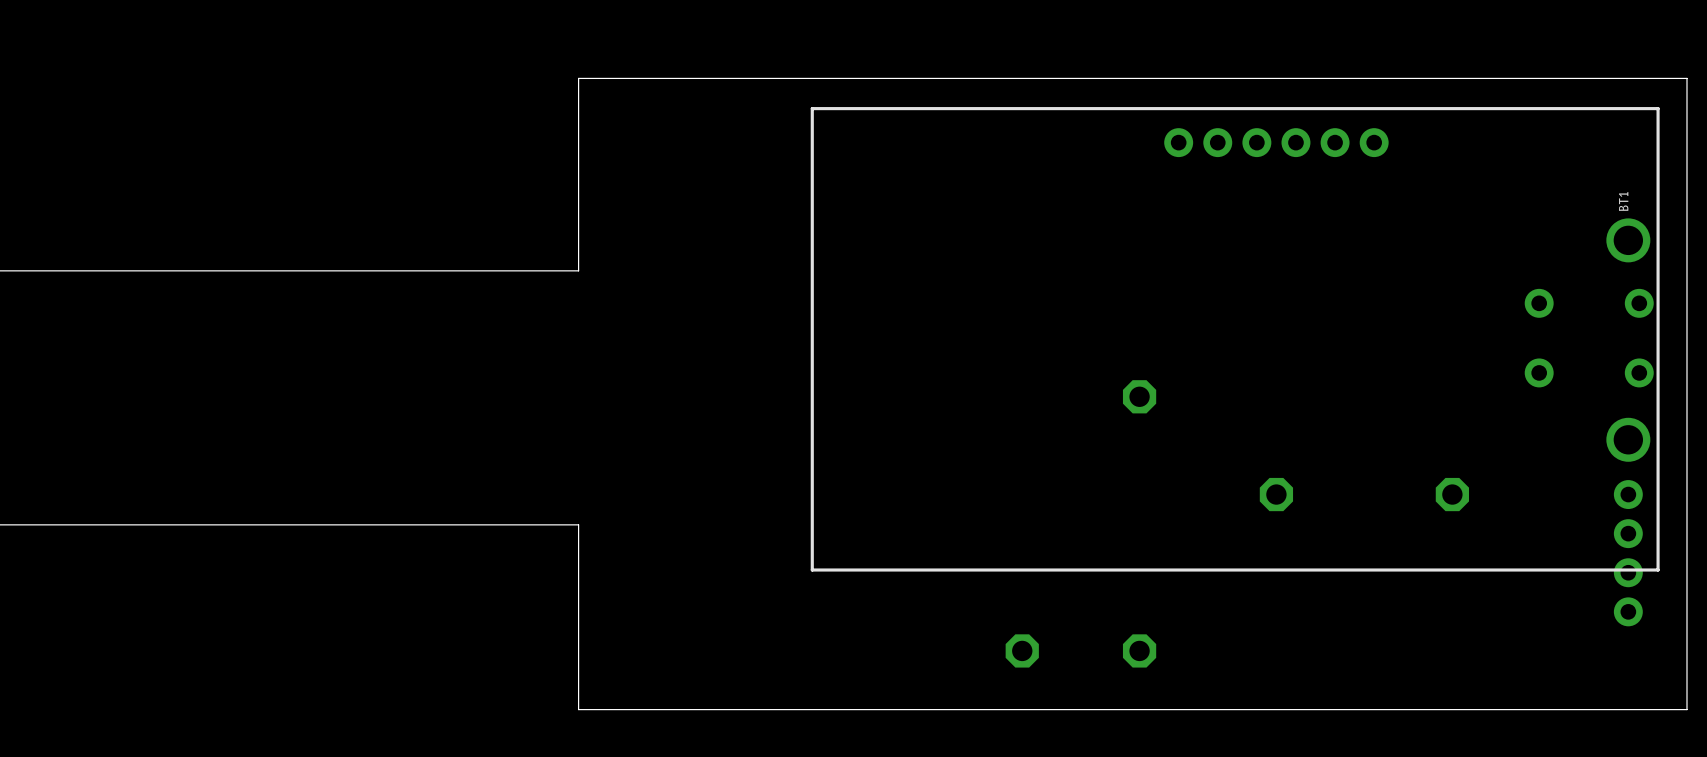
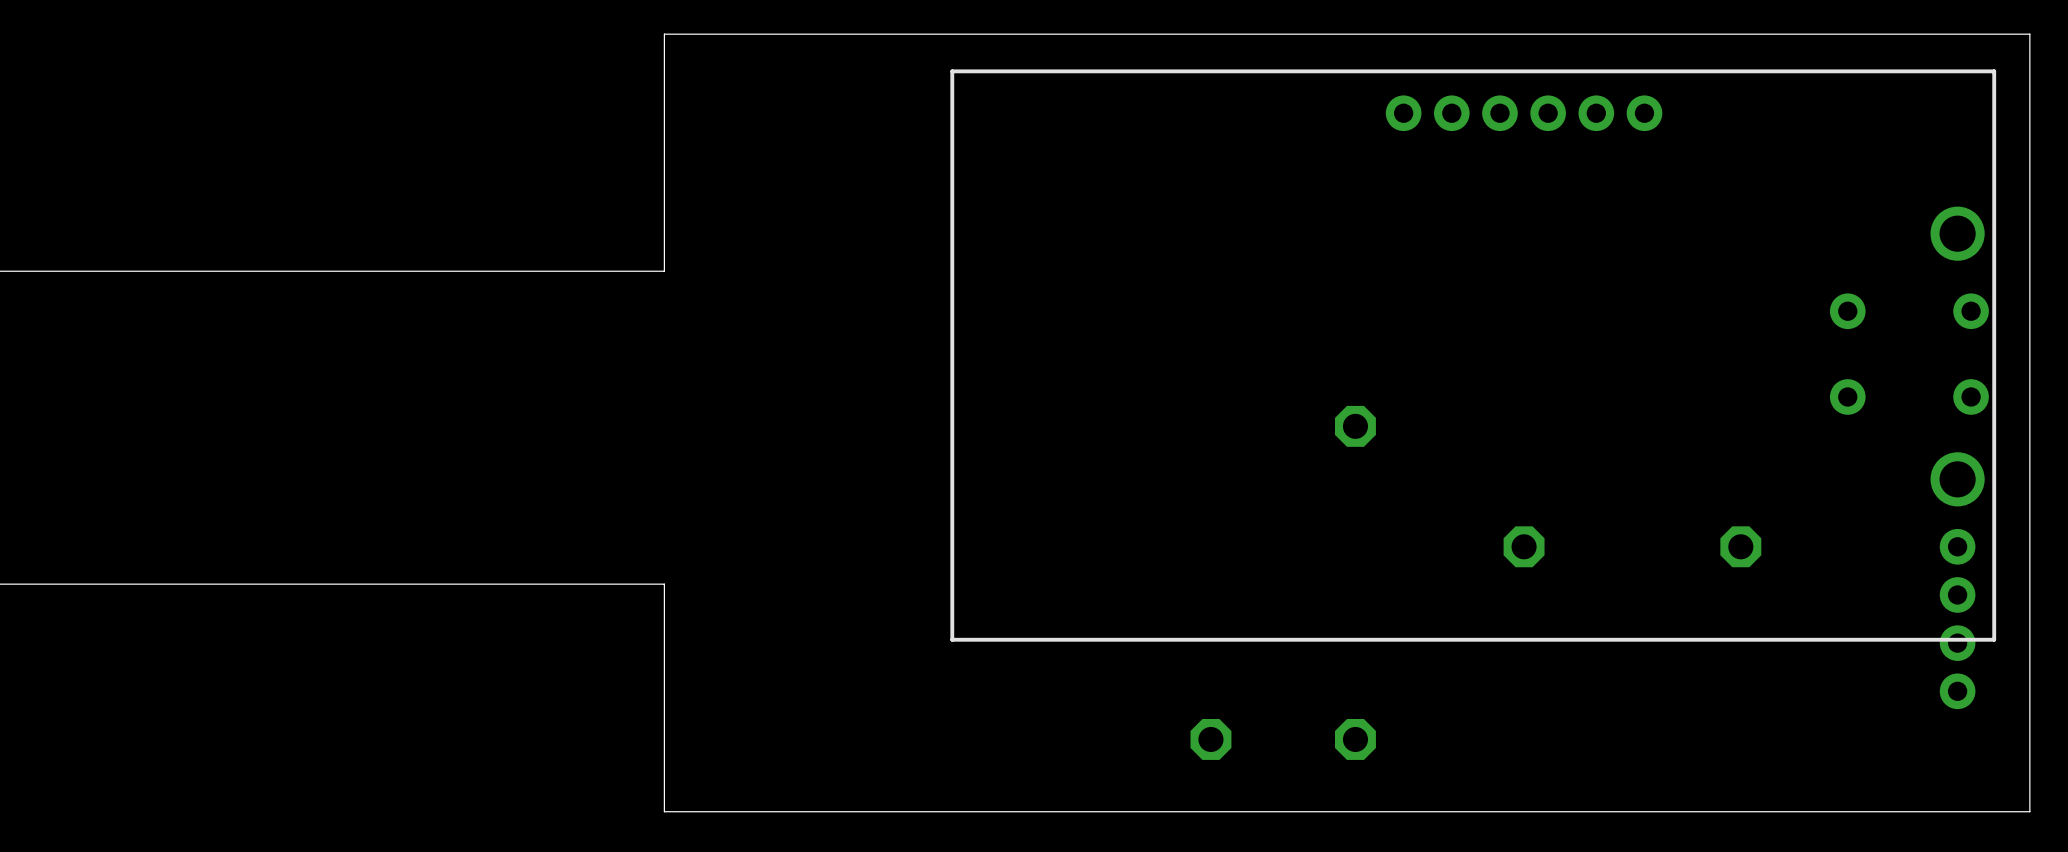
BT1 name: BT1 (1623, 201) -> none

